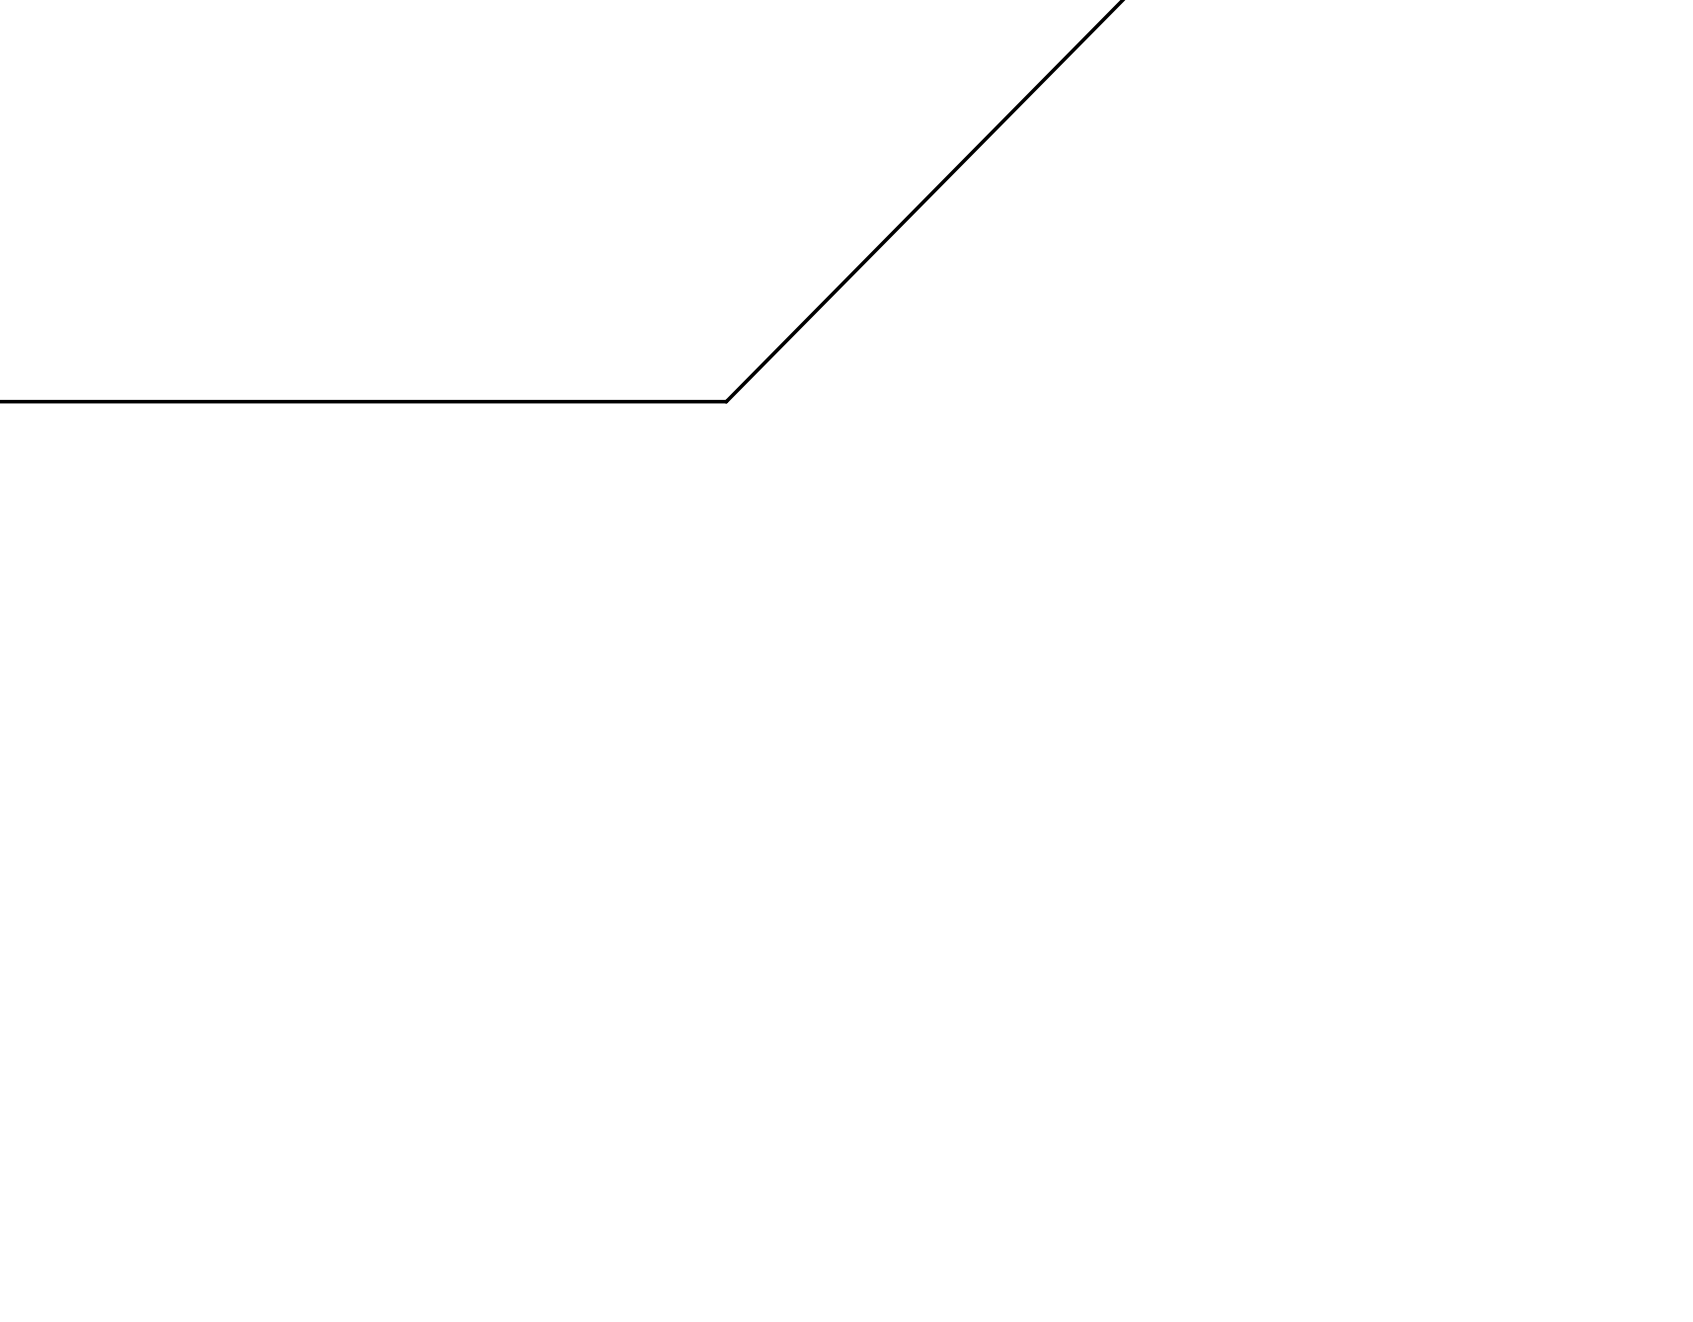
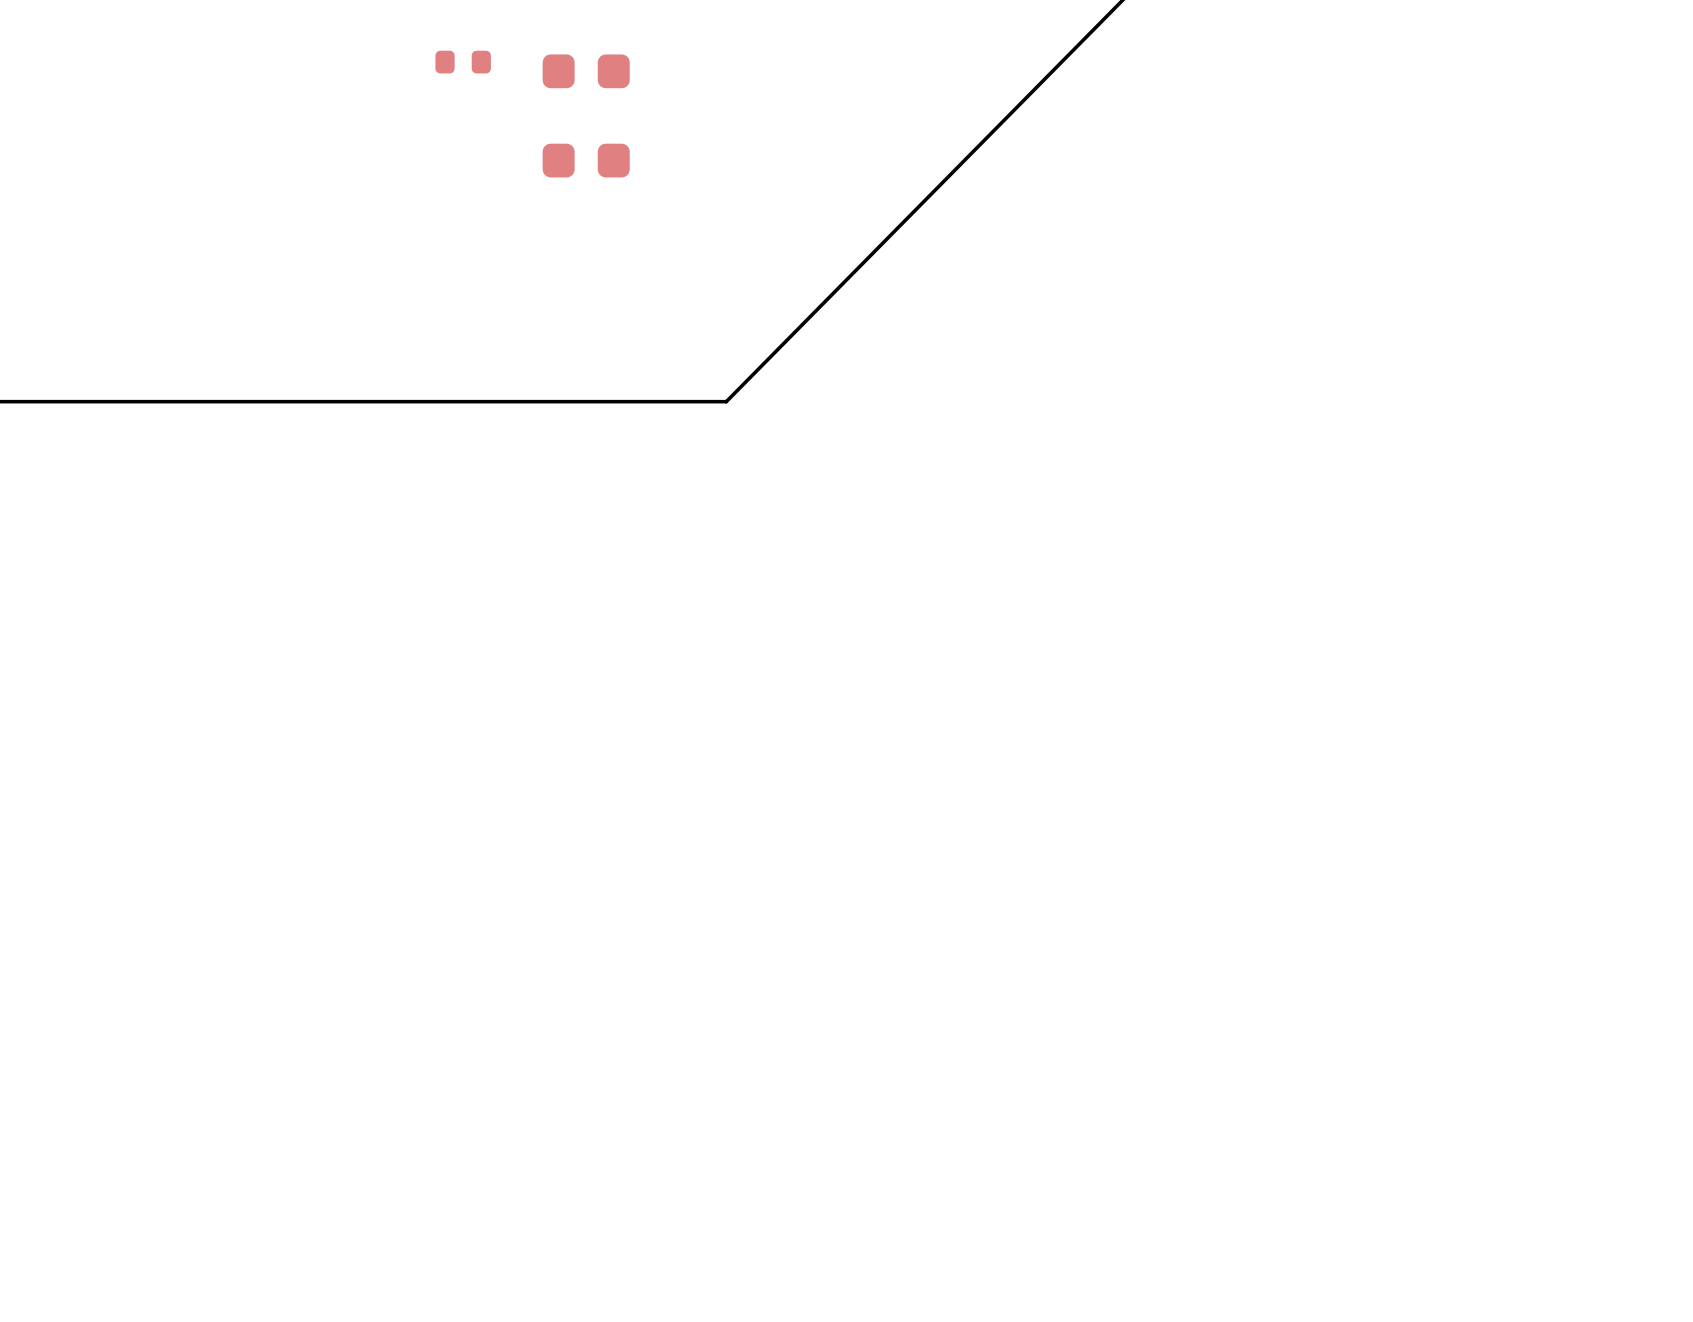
part: none -> (463, 62)
part: none -> (586, 71)
part: none -> (586, 160)

